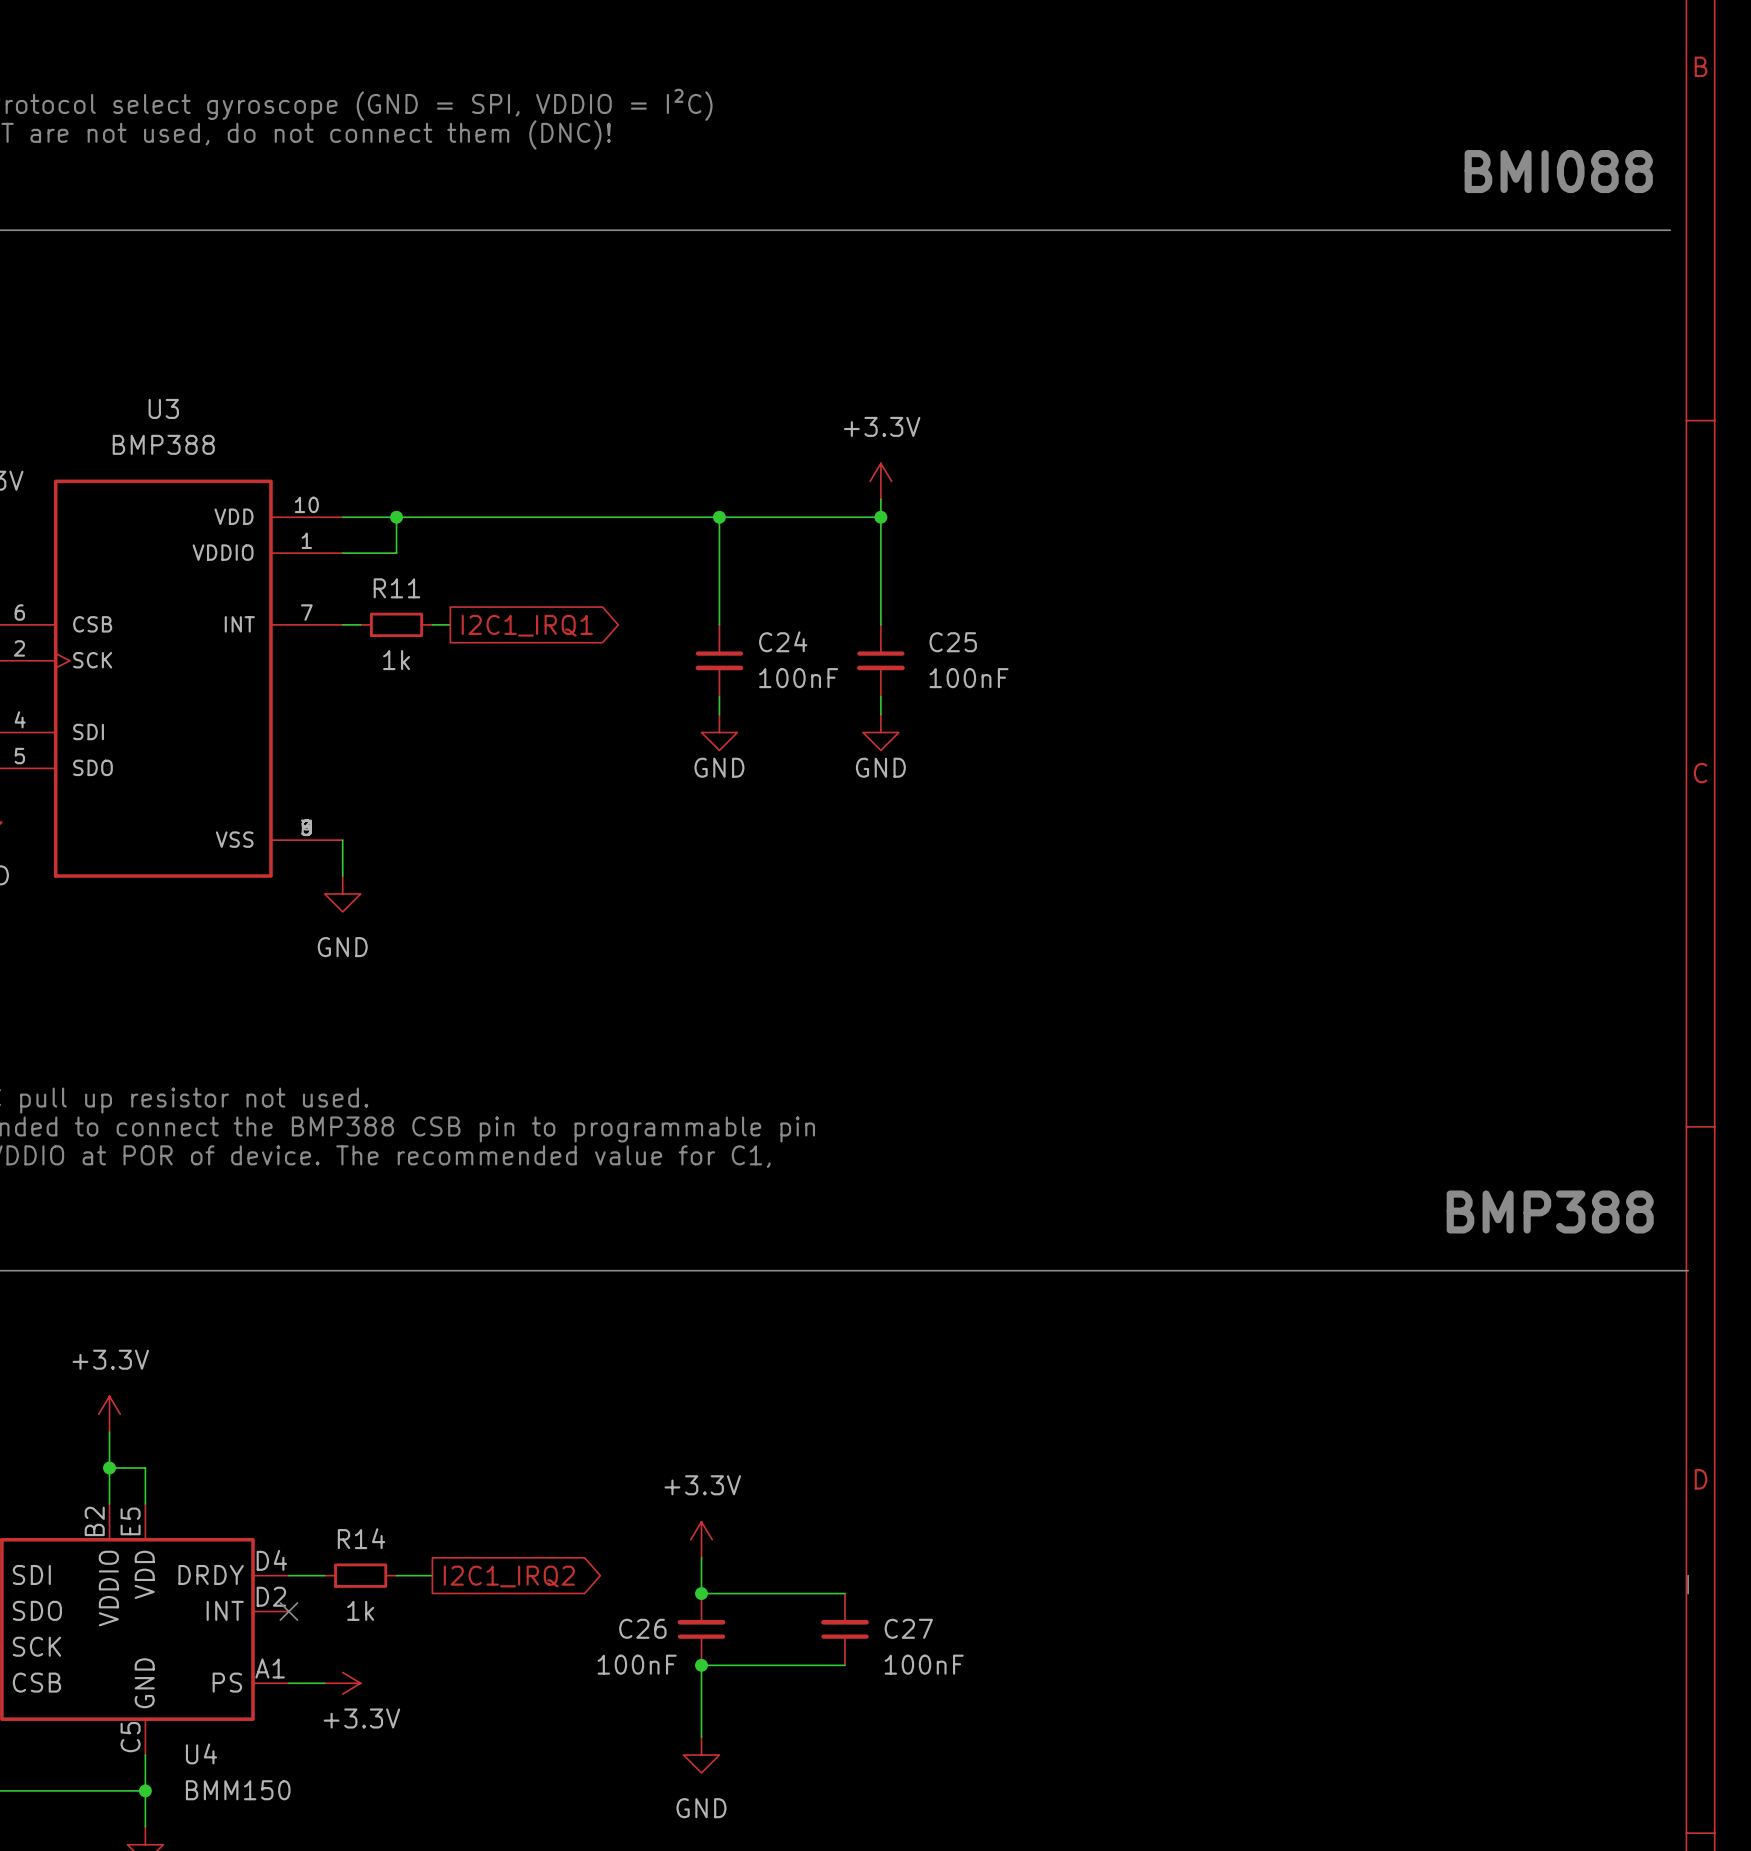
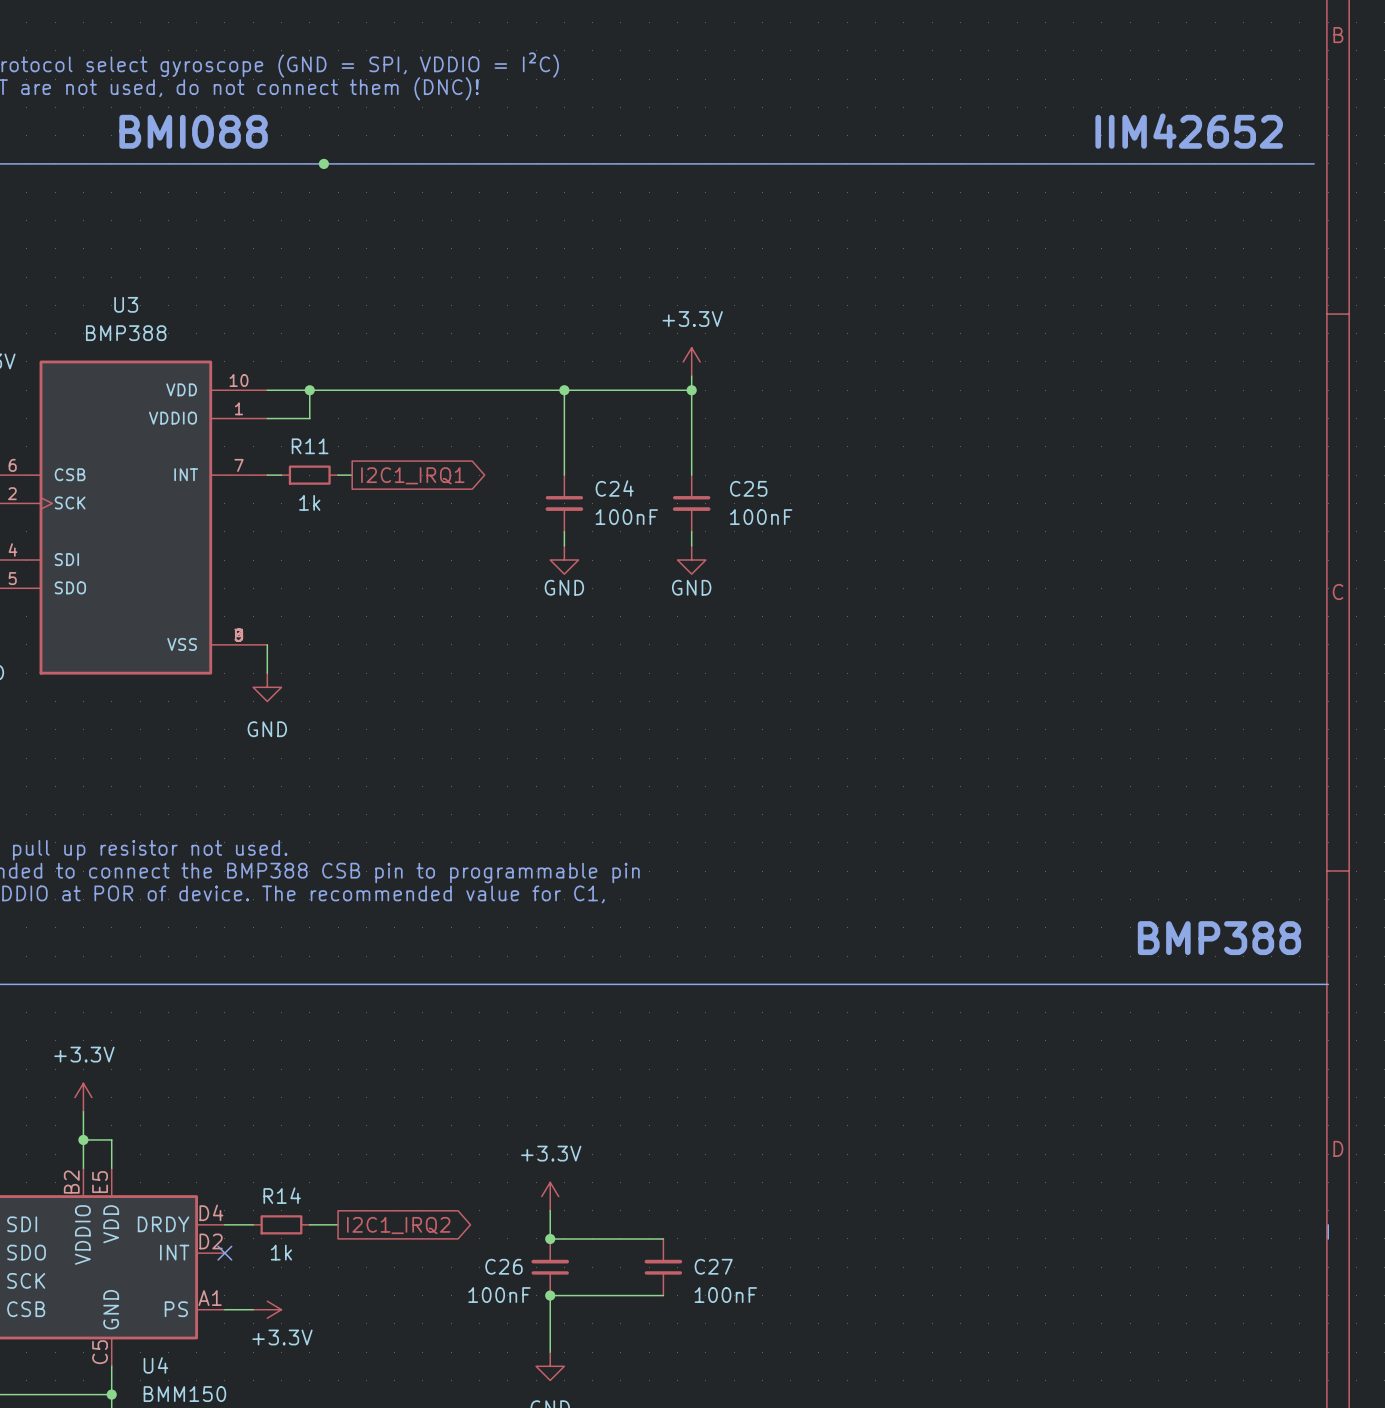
text: BMI088 (1558, 171) -> none
text: none -> IIM42652 (1189, 131)
text: none -> BMI088 (193, 131)
junction: none -> (323, 163)

